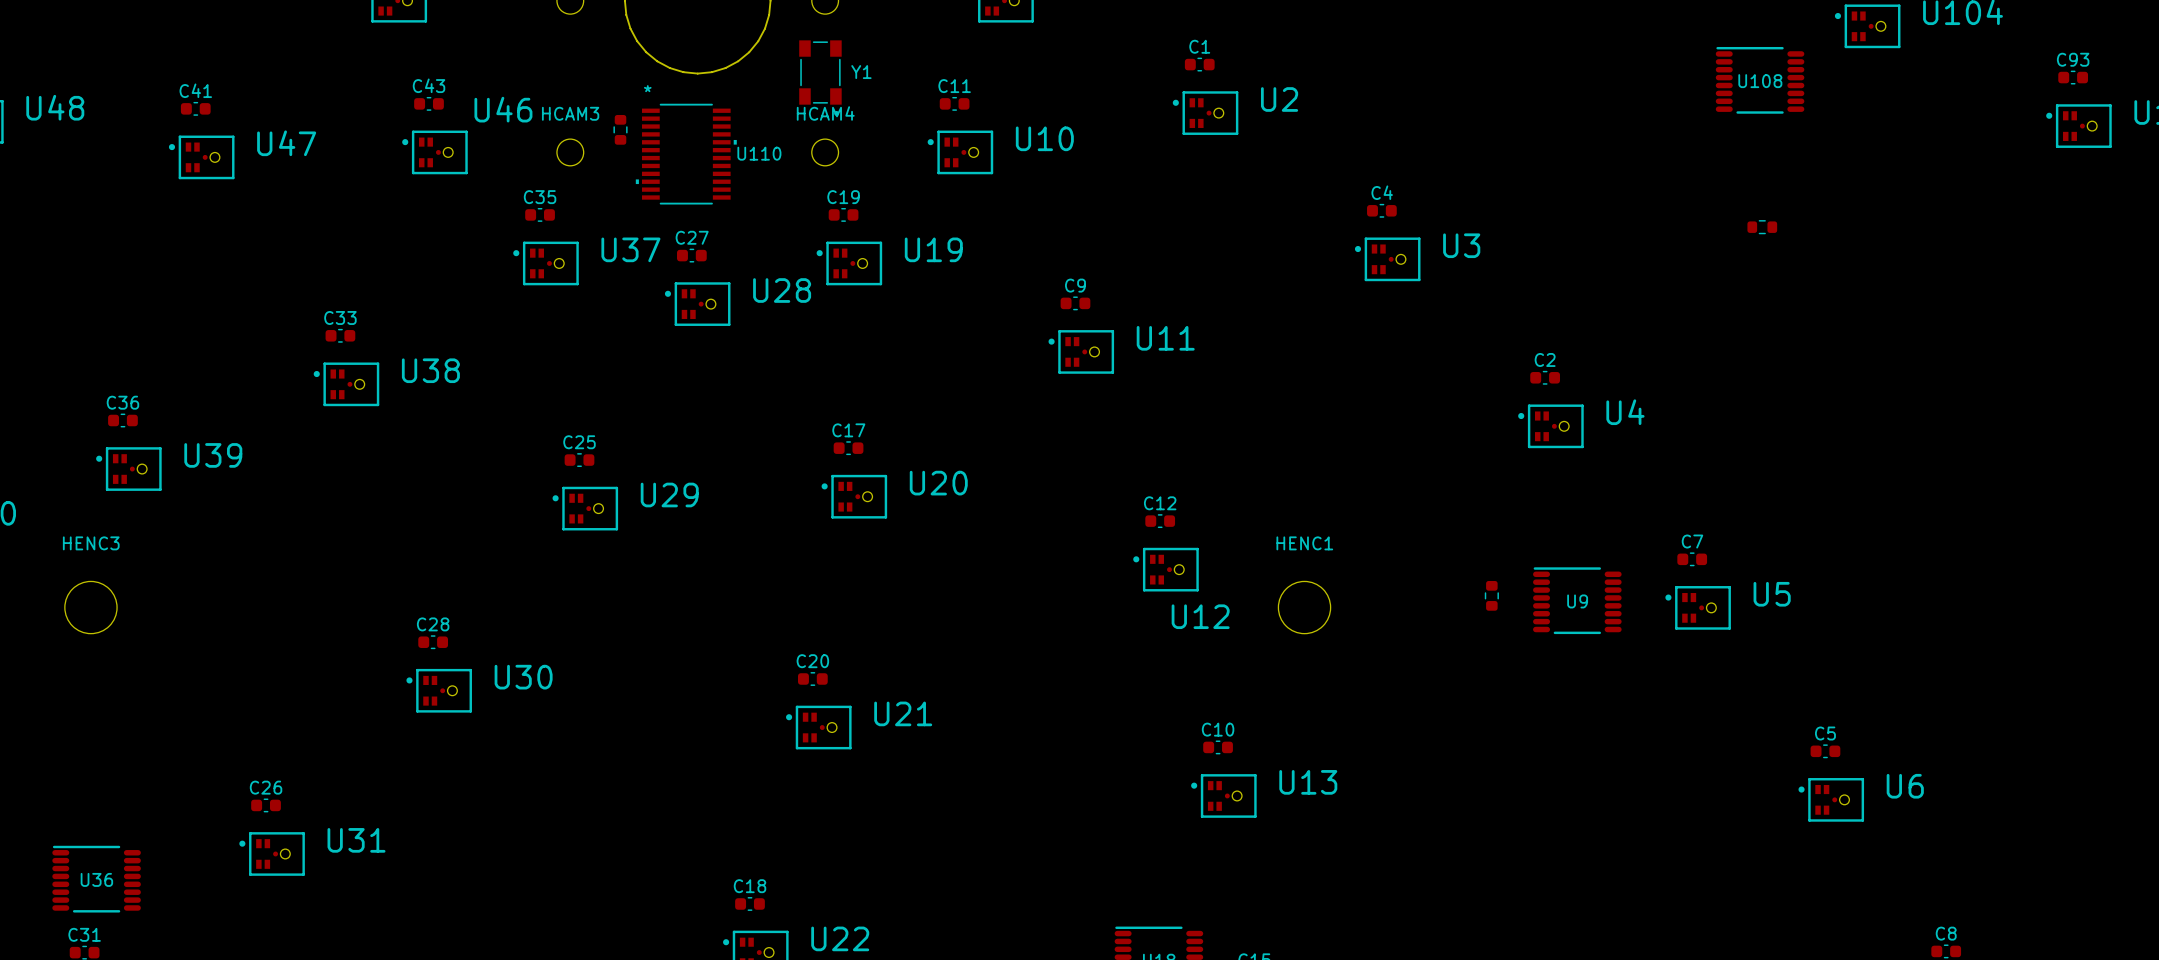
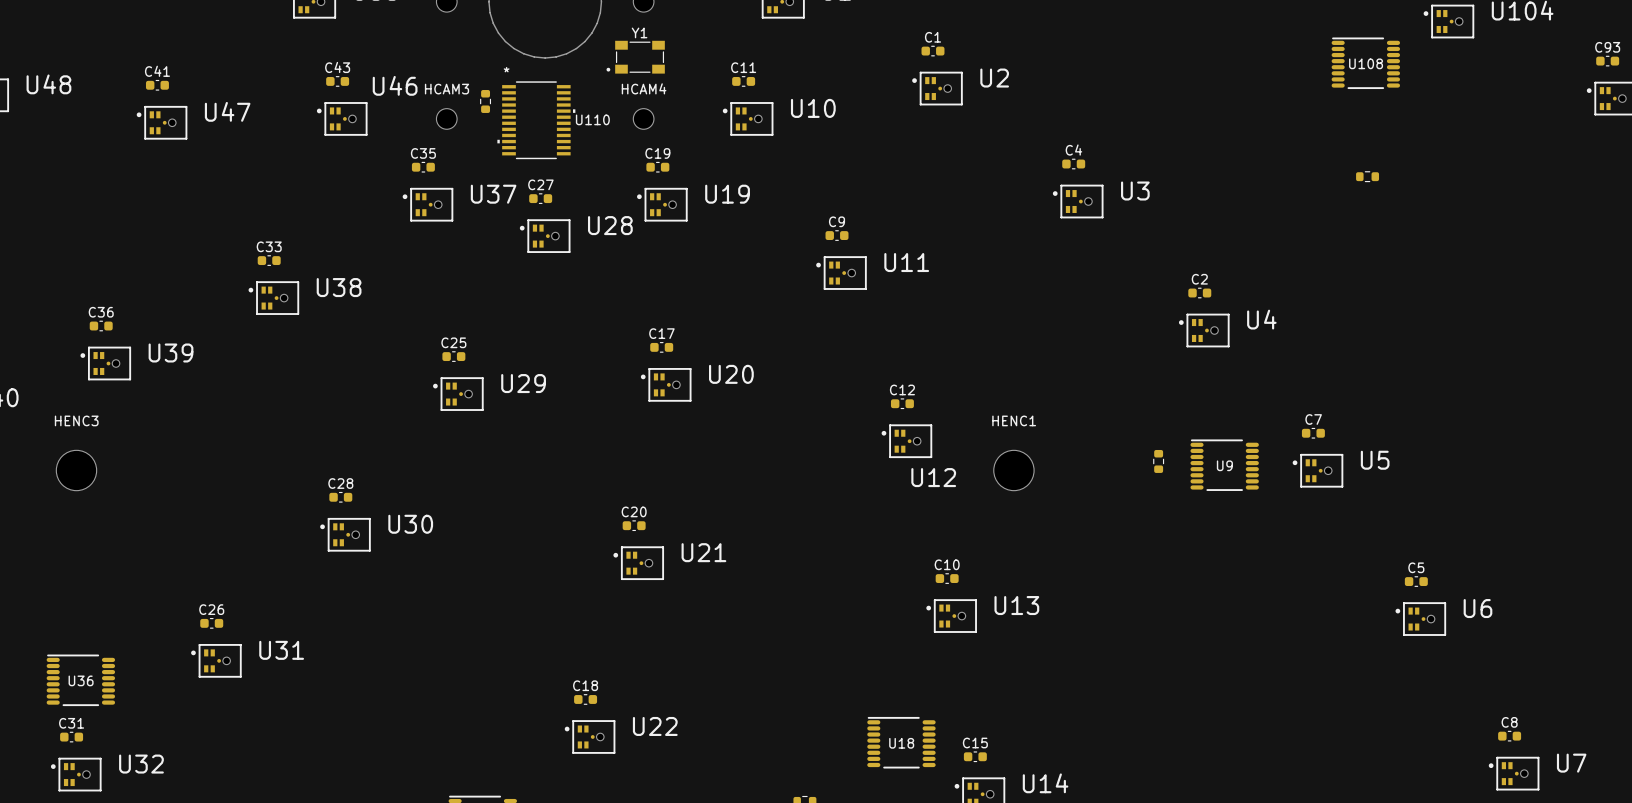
Y1 name position: Y1 (861, 72) -> Y1 (639, 32)
Y1 rotation: 0° (820, 78) -> 90° clockwise (635, 57)

